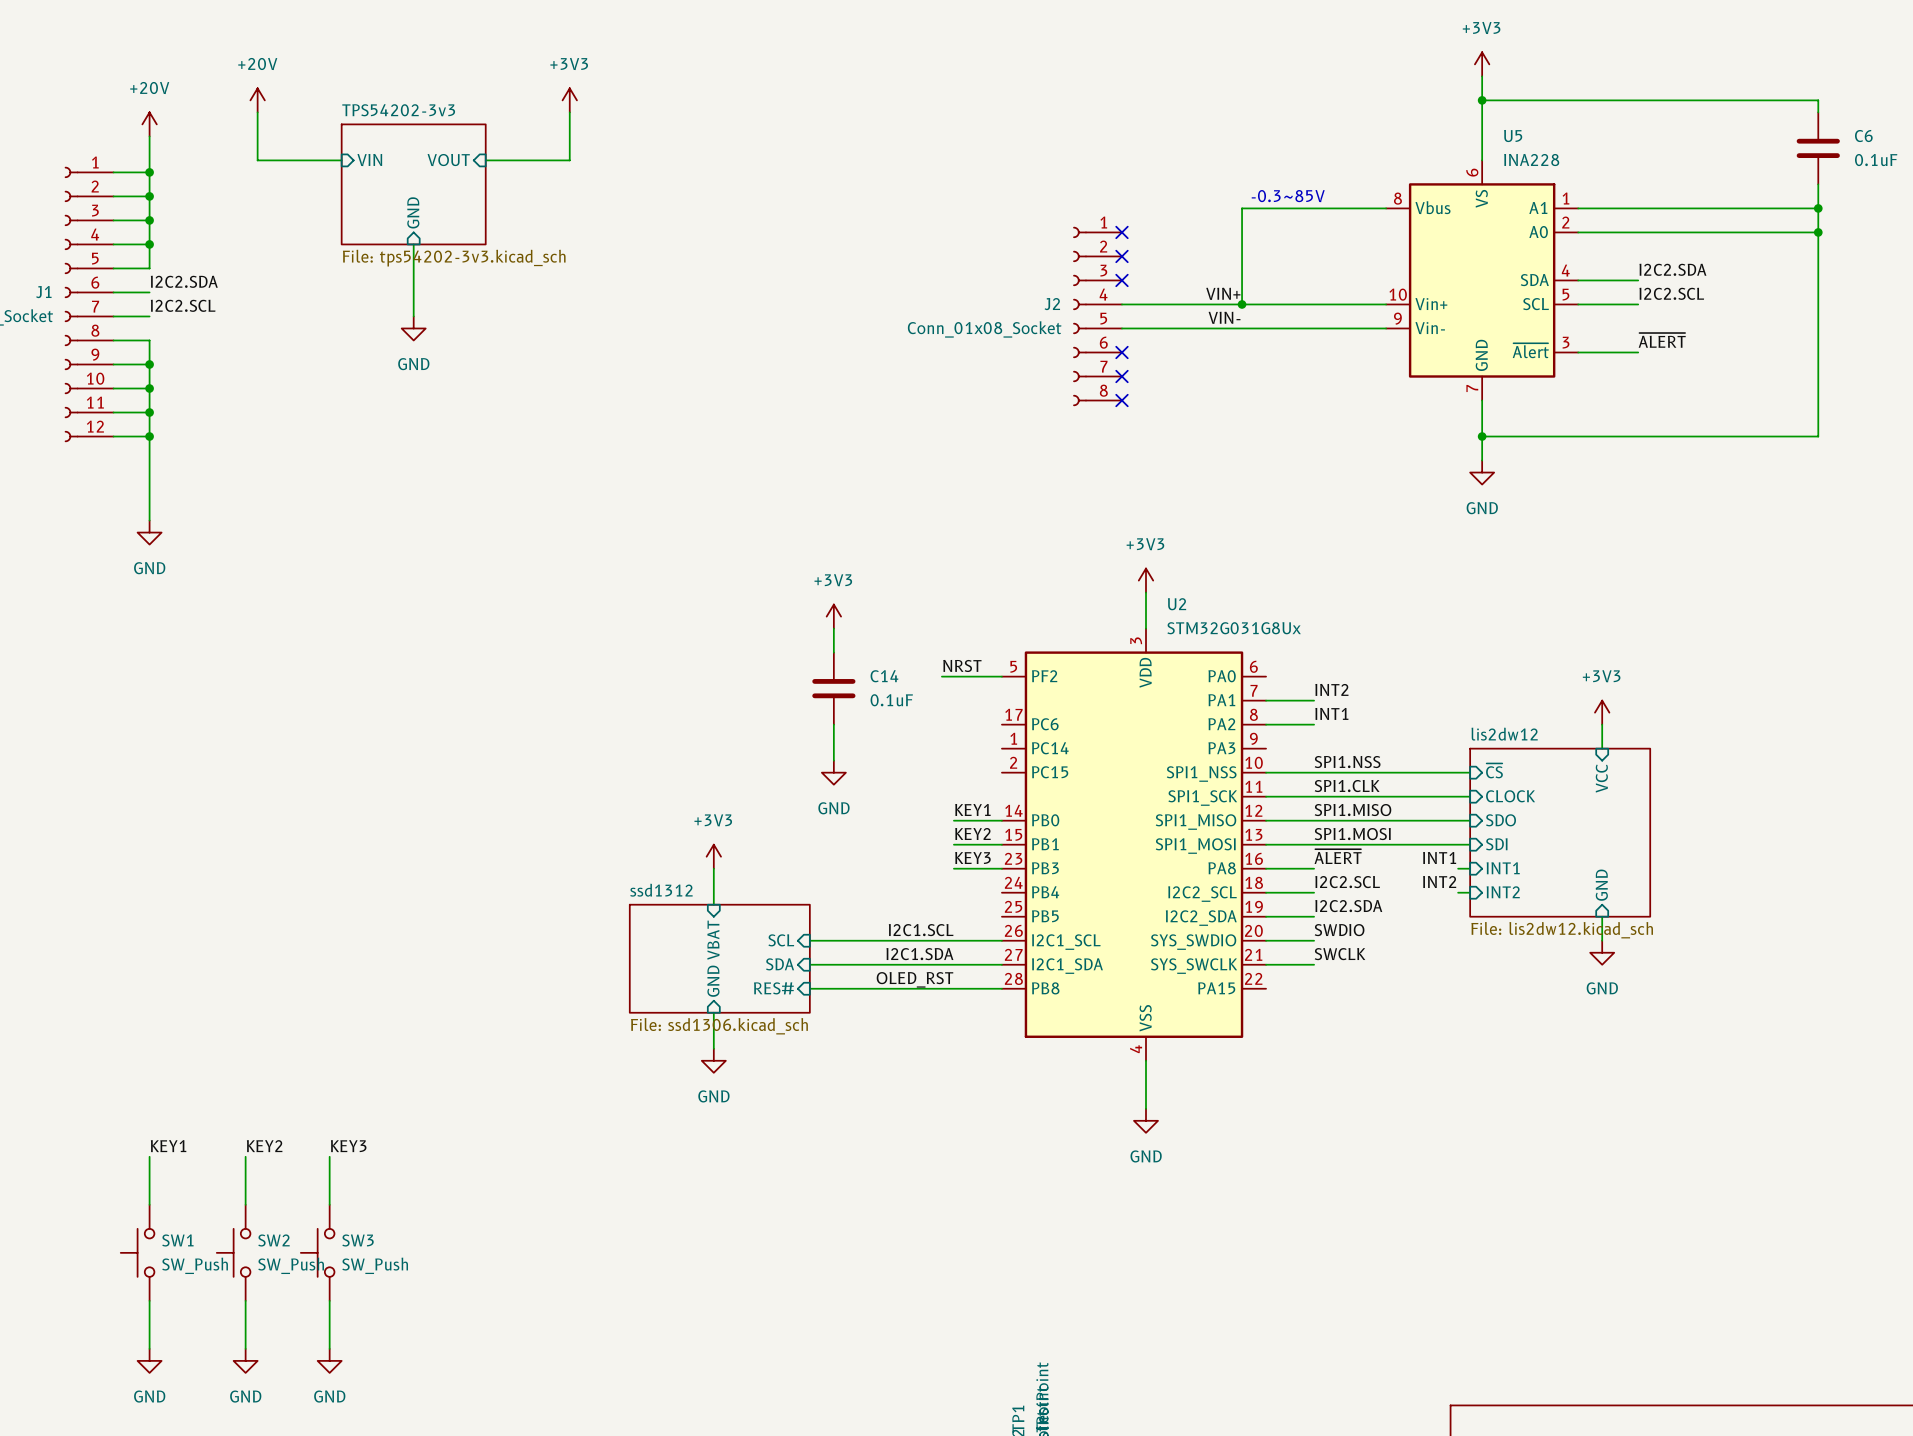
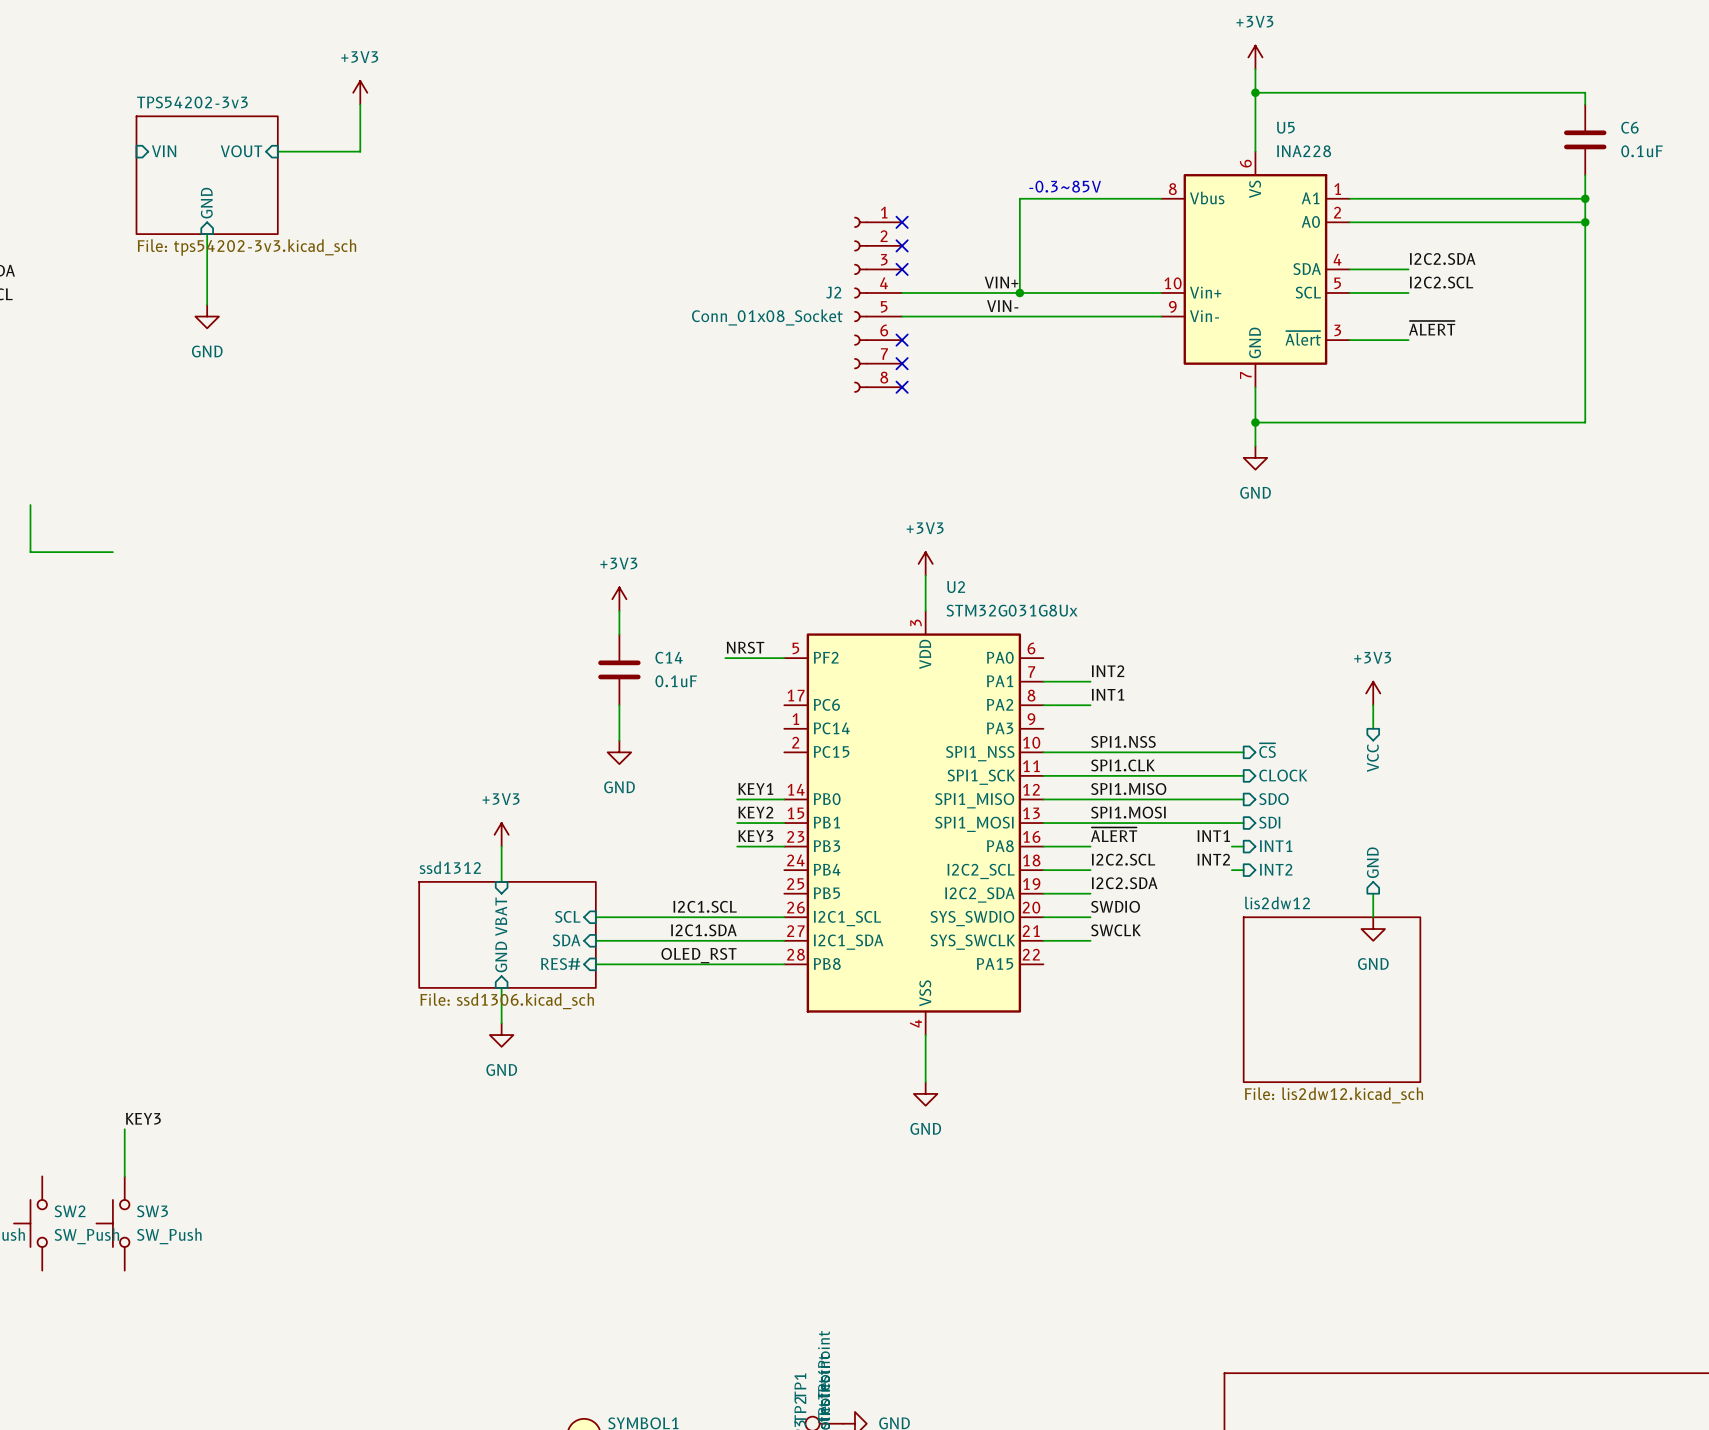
power symbol: +20V (257, 100) -> none
wire: (257, 112) (257, 160) (341, 160) -> none
wire: none -> (30, 505) (30, 552) (112, 552)
sheet lis2dw12 position: (1560, 832) -> (1332, 999)
label: KEY2 (264, 1146) -> none
wire: (245, 1156) (245, 1204) -> none
wire: (245, 1300) (245, 1348) -> none
wire: (329, 1300) (329, 1348) -> none
power symbol: GND (245, 1360) -> none
power symbol: GND (329, 1360) -> none

